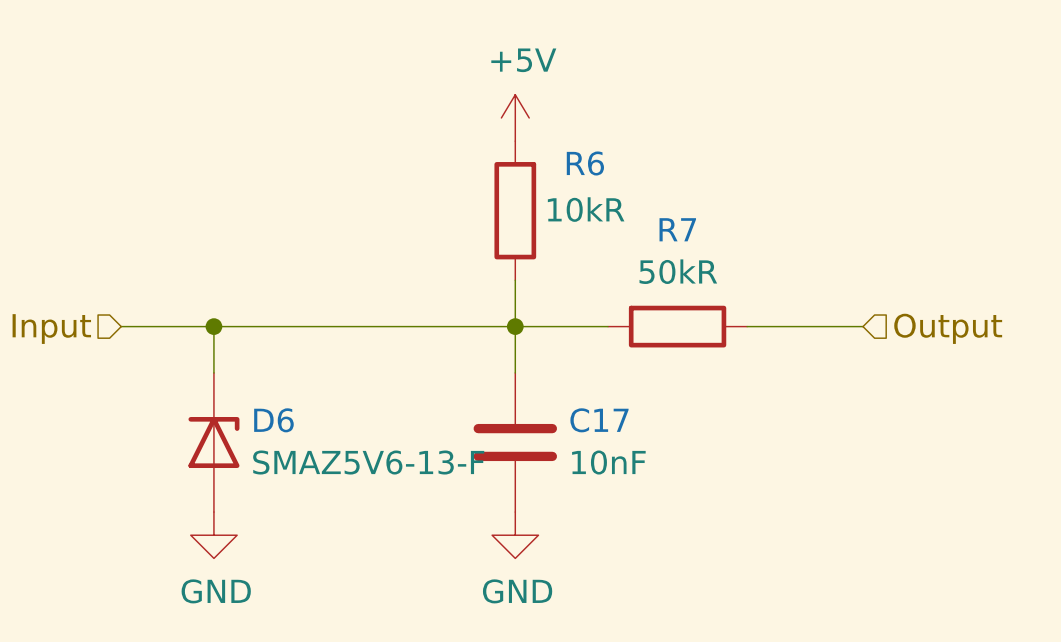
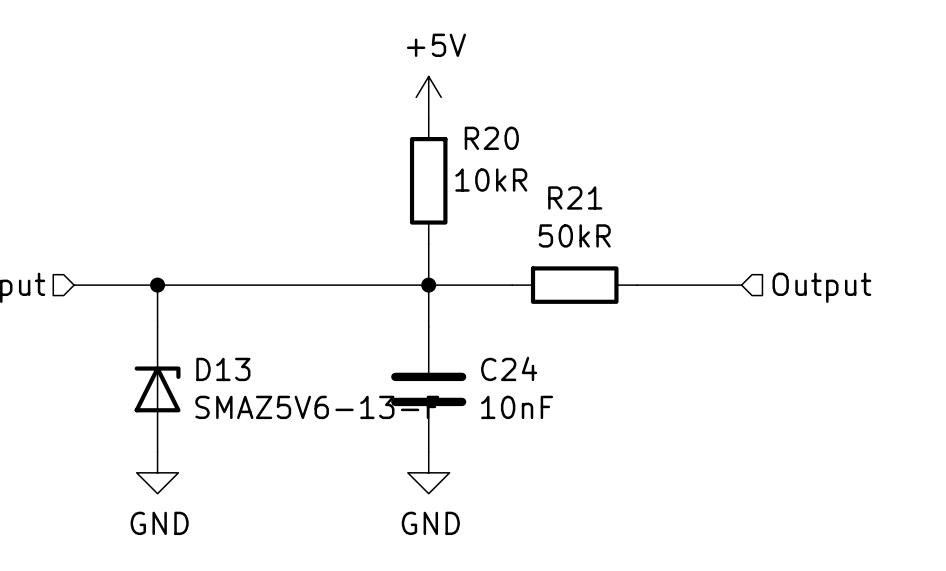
R6 name: R6 (585, 163) -> R20 (491, 138)
R7 name: R7 (677, 229) -> R21 (575, 197)
D6 name: D6 (273, 420) -> D13 (223, 369)
C17 name: C17 (599, 420) -> C24 (509, 368)

